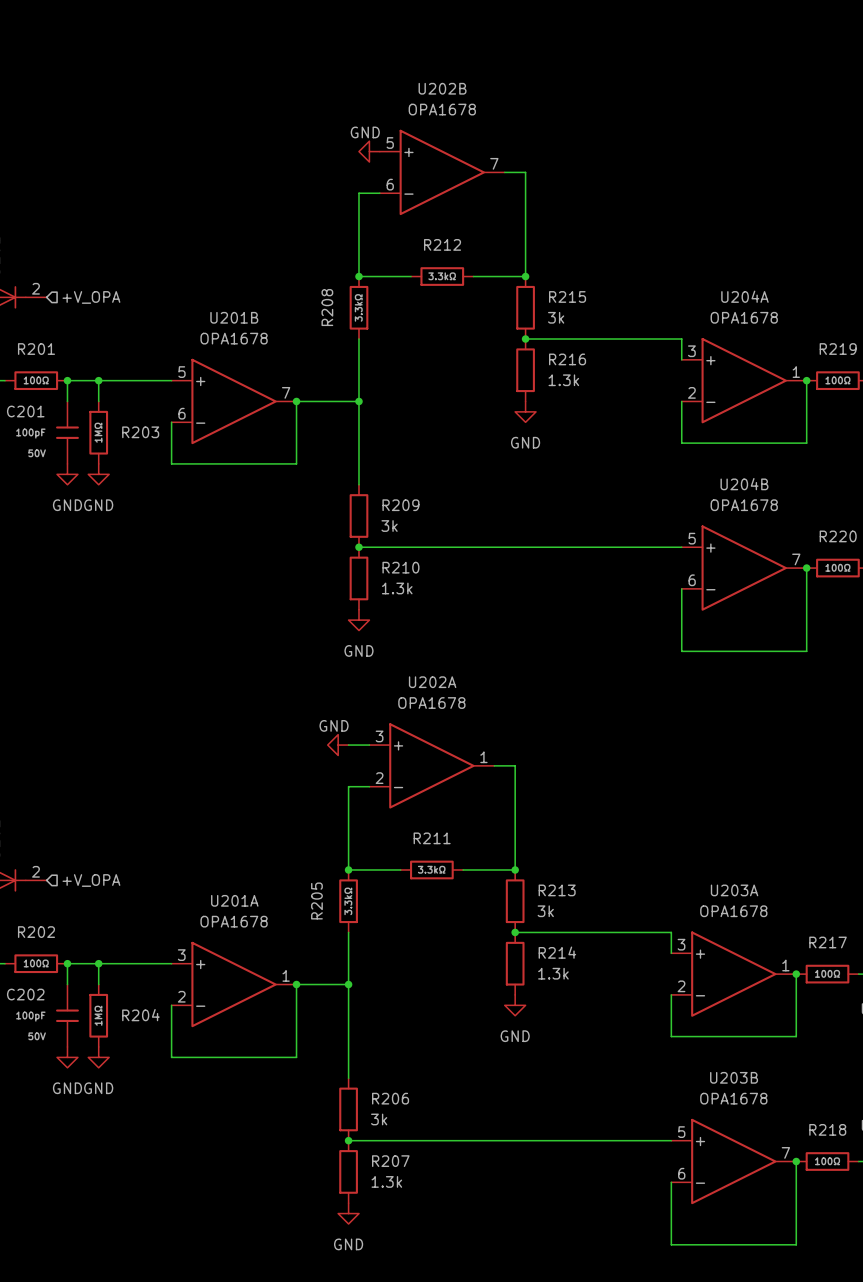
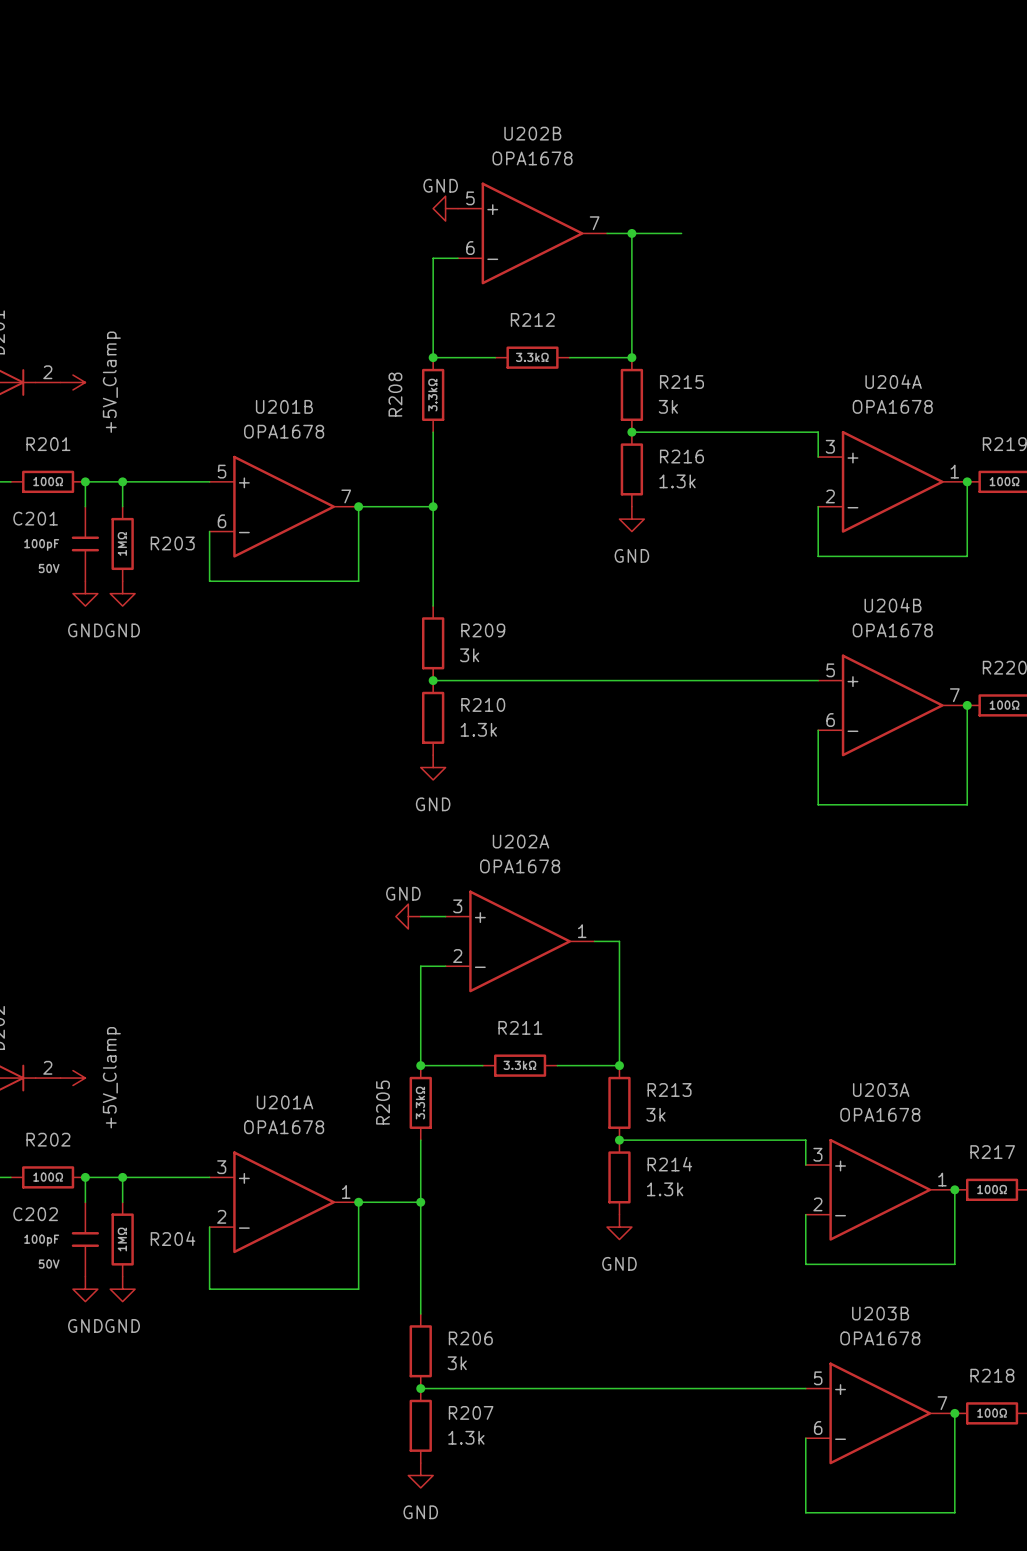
wire: none -> (631, 233) (681, 233)
junction: none -> (631, 233)
power symbol: none -> +5V_Clamp (72, 382)
hierarchical label: +V_OPA (91, 297) -> none
power symbol: none -> +5V_Clamp (72, 1078)
hierarchical label: +V_OPA (91, 880) -> none

